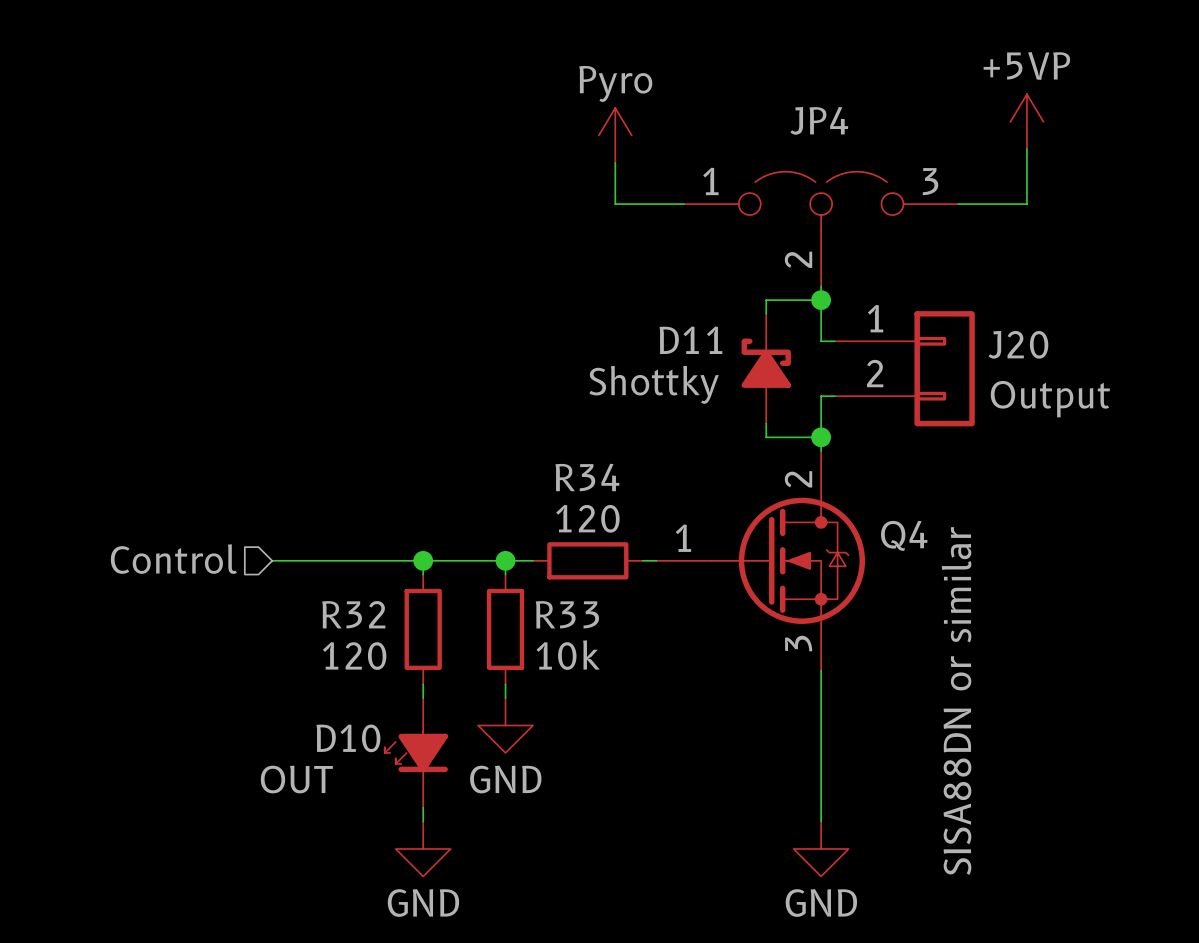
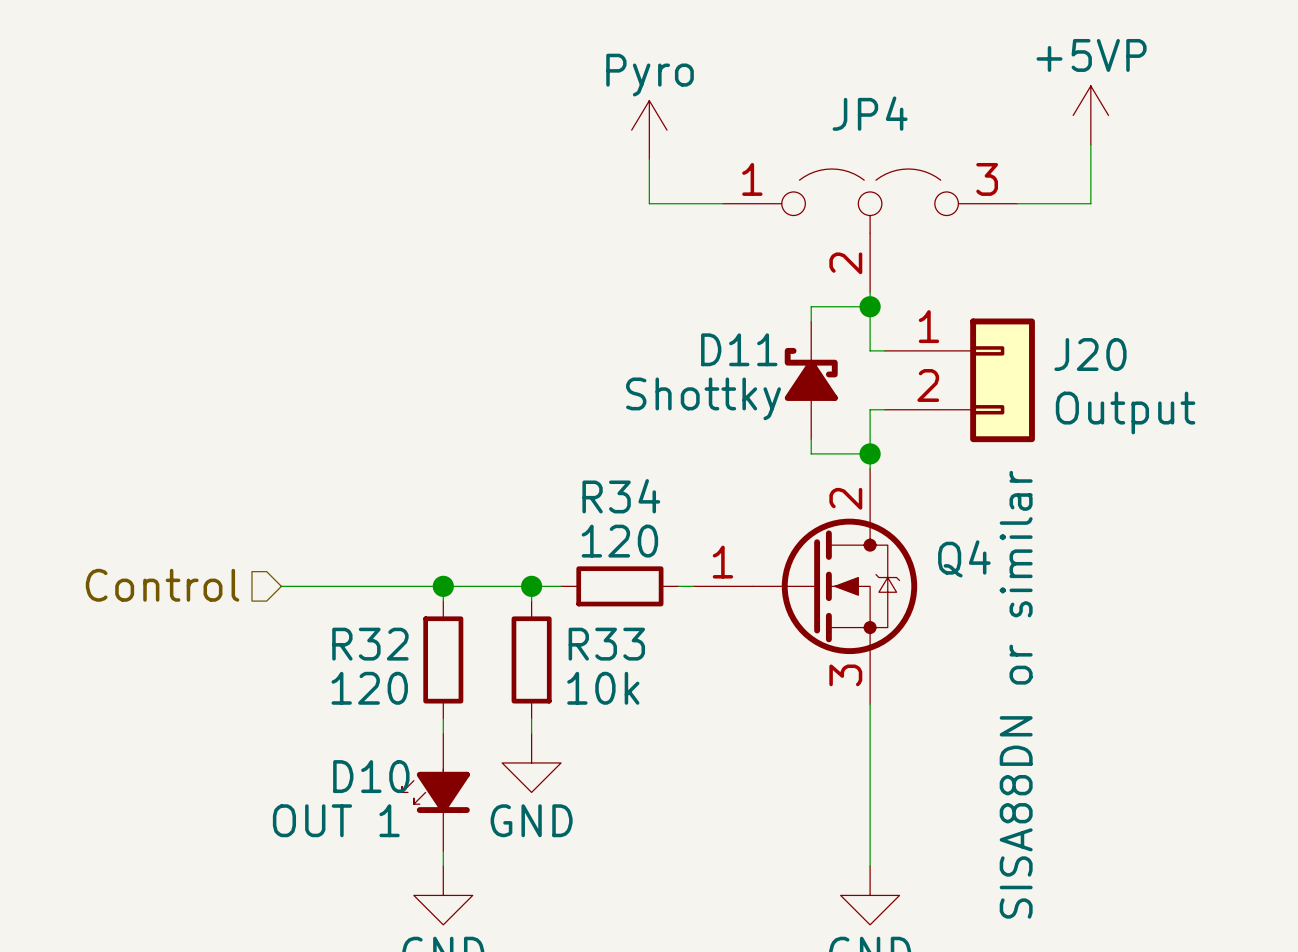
D10 value: OUT (296, 779) -> OUT 1 (336, 820)

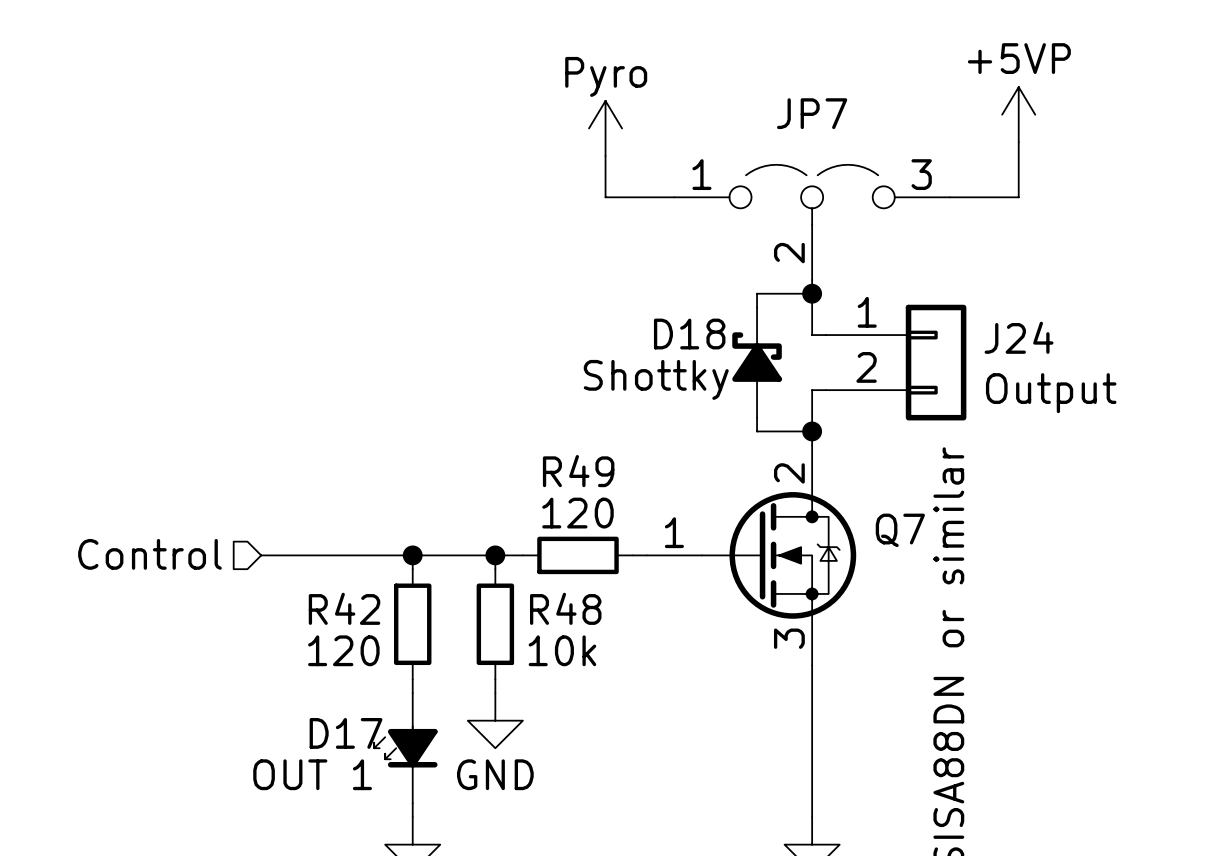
JP4 name: JP4 (870, 113) -> JP7 (812, 113)
D11 name: D11 (739, 349) -> D18 (689, 334)
J20 name: J20 (1090, 354) -> J24 (1019, 337)
R34 name: R34 (621, 496) -> R49 (578, 471)
Q4 name: Q4 (964, 558) -> Q7 (900, 530)
R32 name: R32 (370, 644) -> R42 (344, 608)
R33 name: R33 (606, 644) -> R48 (565, 608)
D10 name: D10 (371, 776) -> D17 (346, 733)

